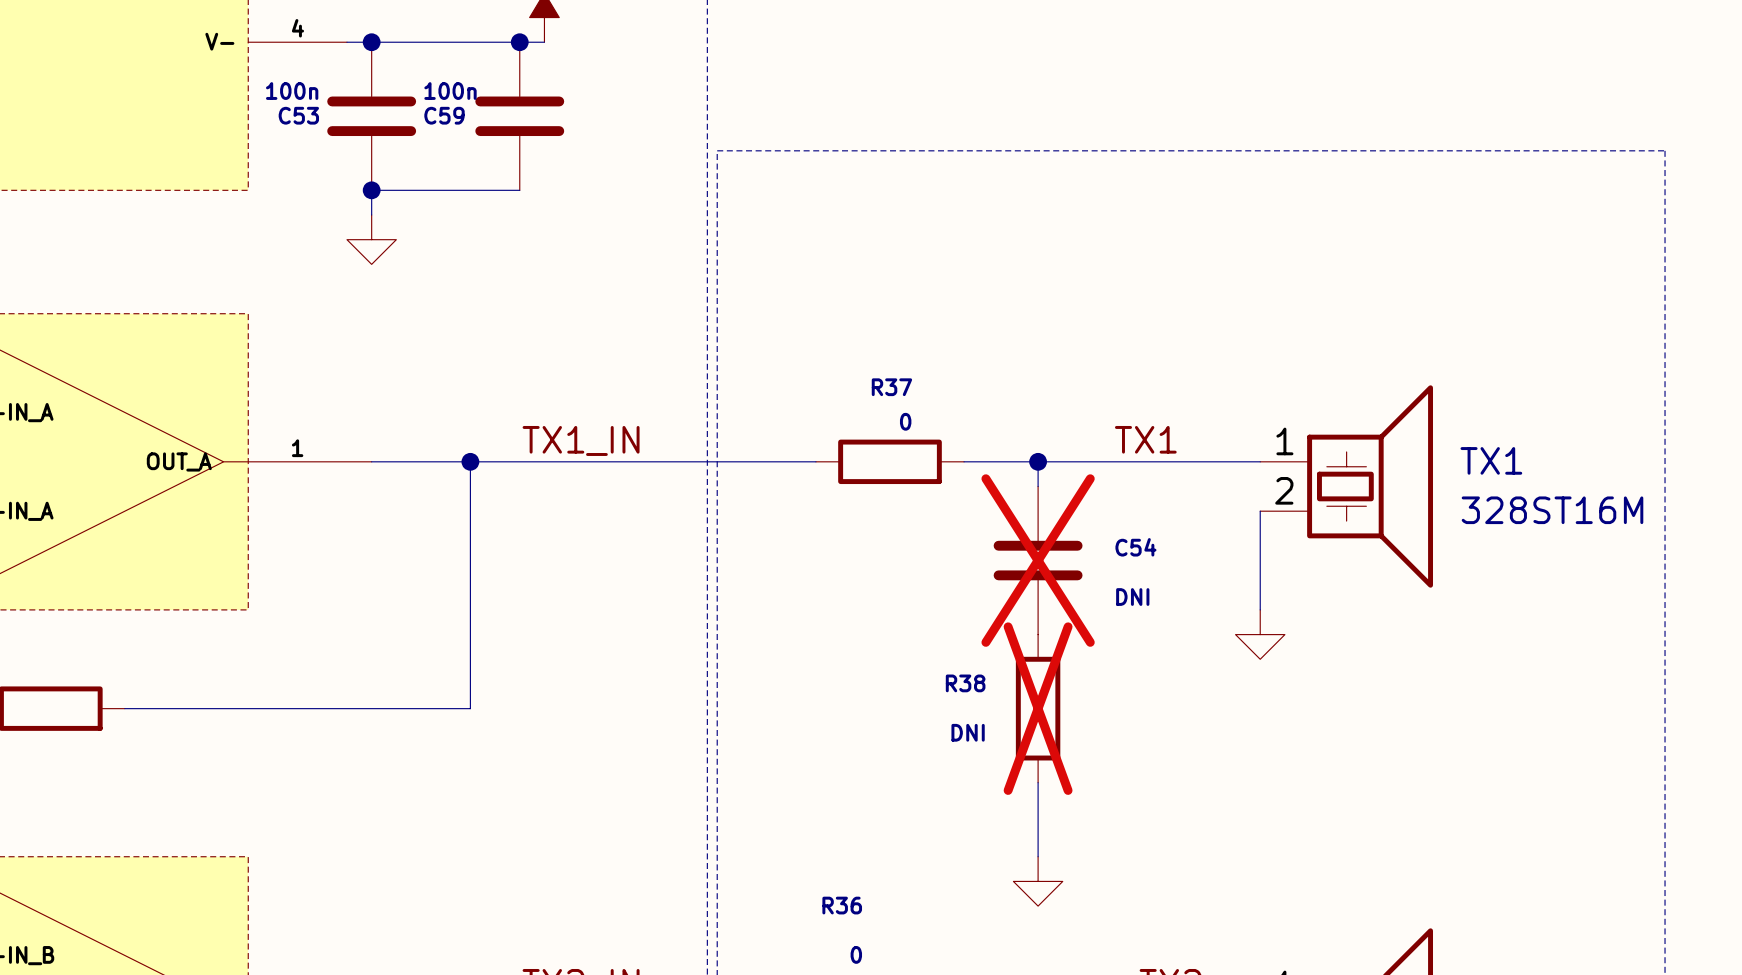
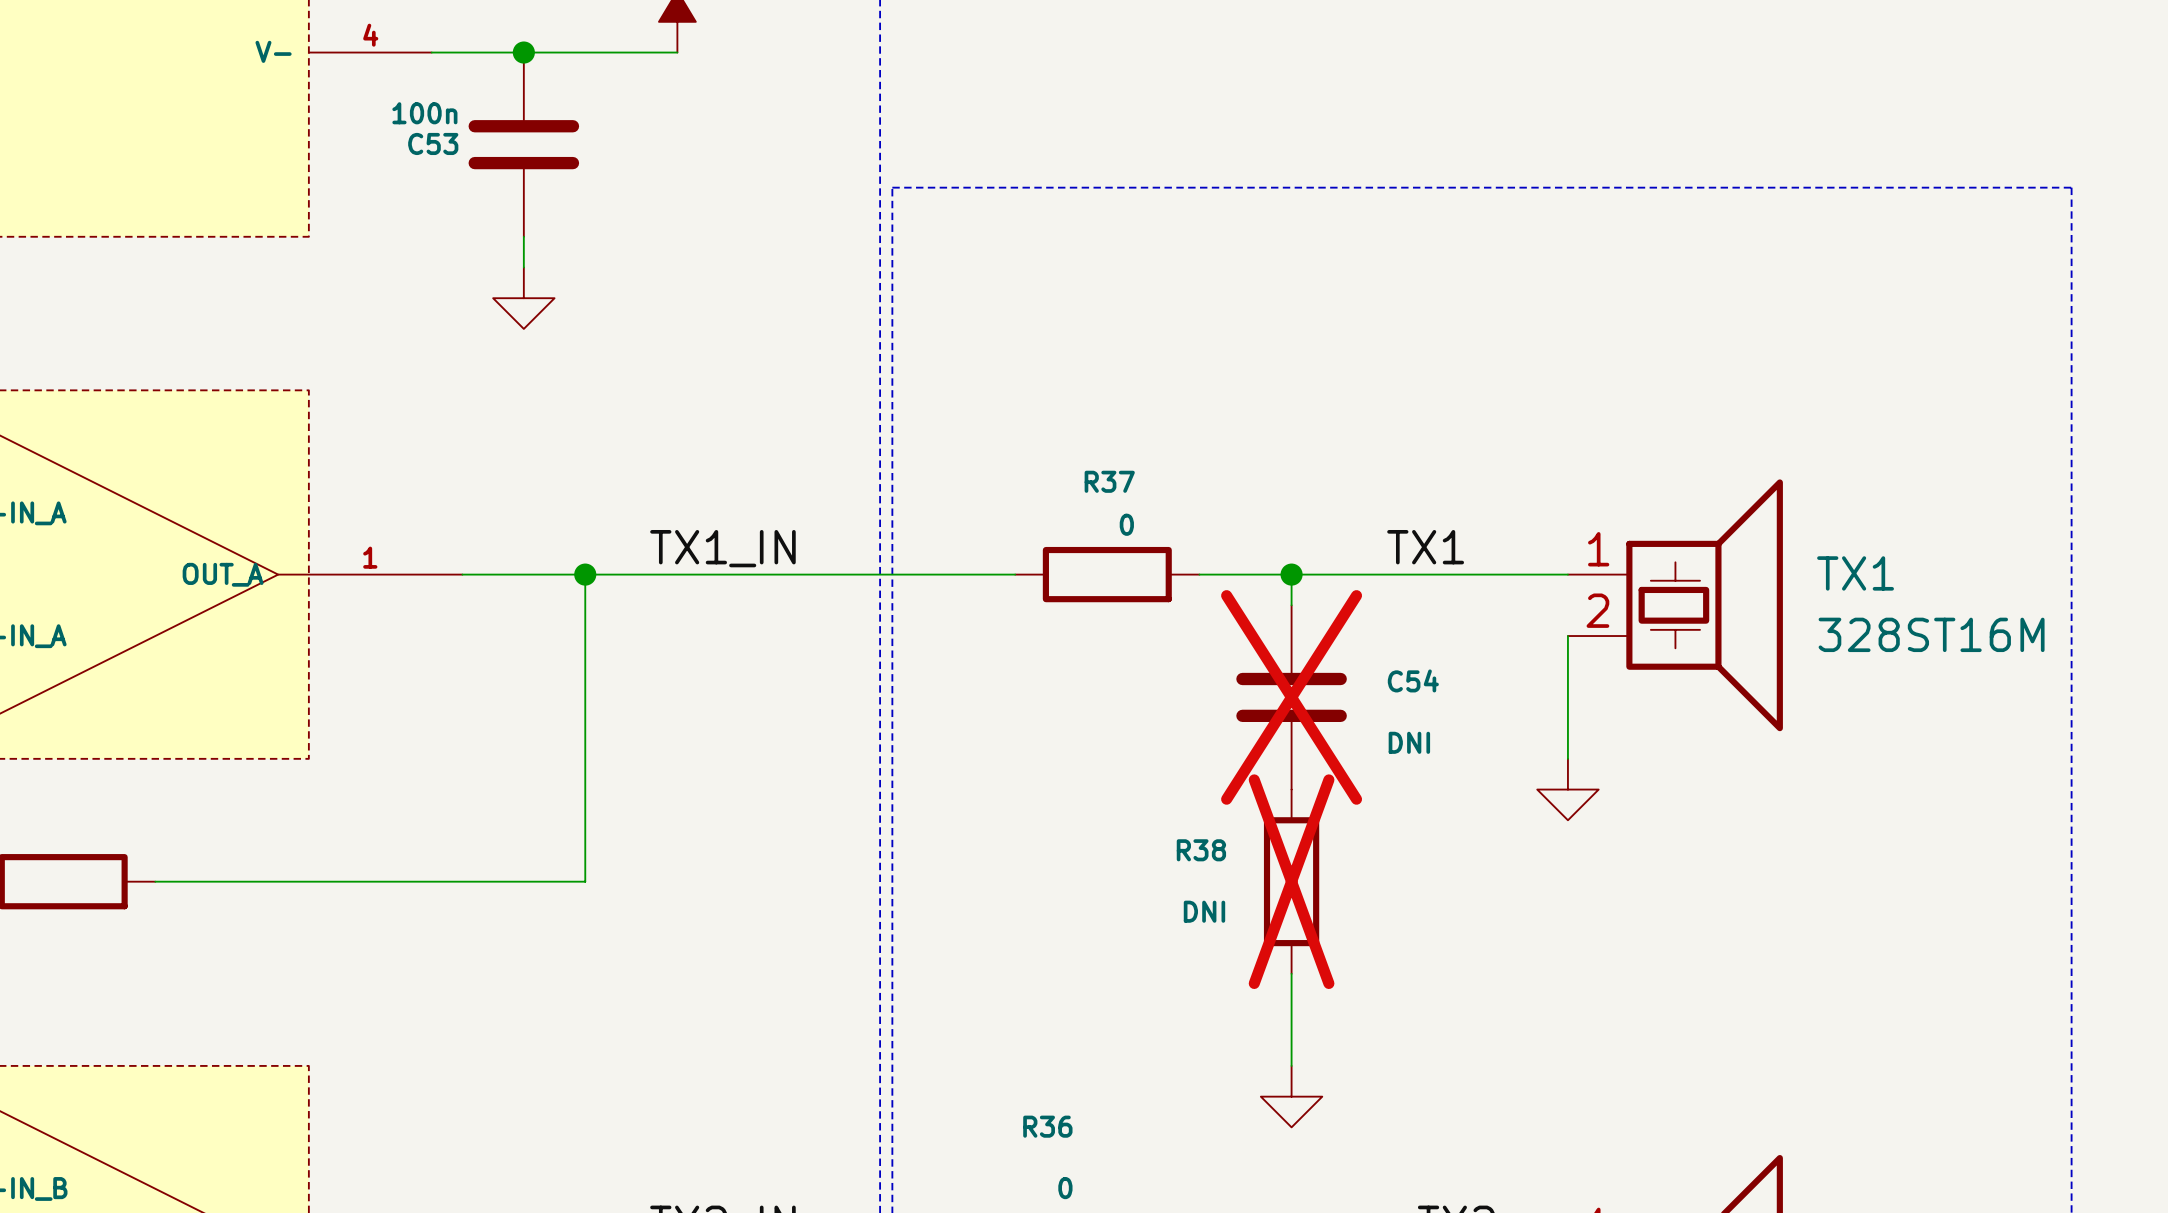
junction: (371, 42) -> none
junction: none -> (523, 52)
junction: (519, 42) -> none
C53 position: (371, 116) -> (523, 144)
C59: 100n (519, 116) -> none
junction: (371, 190) -> none
wire: none -> (523, 236) (523, 267)
wire: (519, 190) (371, 190) (371, 215) -> none
power symbol position: (371, 239) -> (523, 298)

